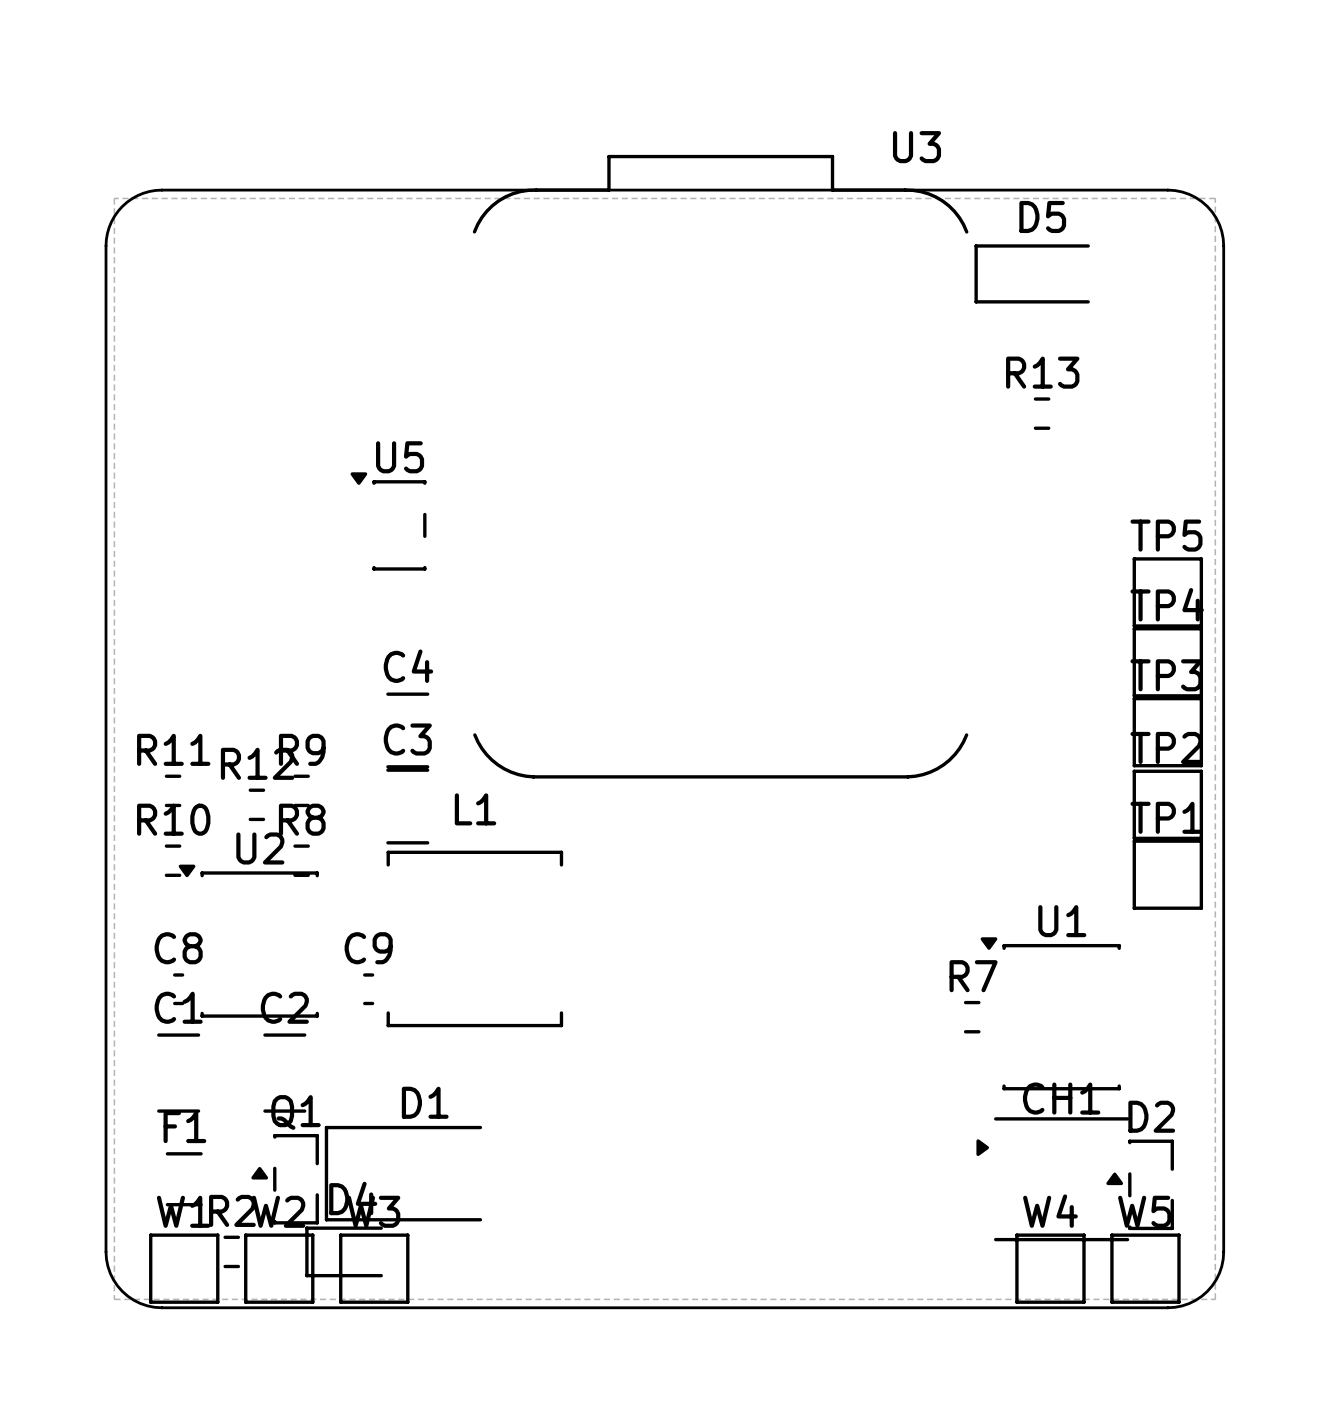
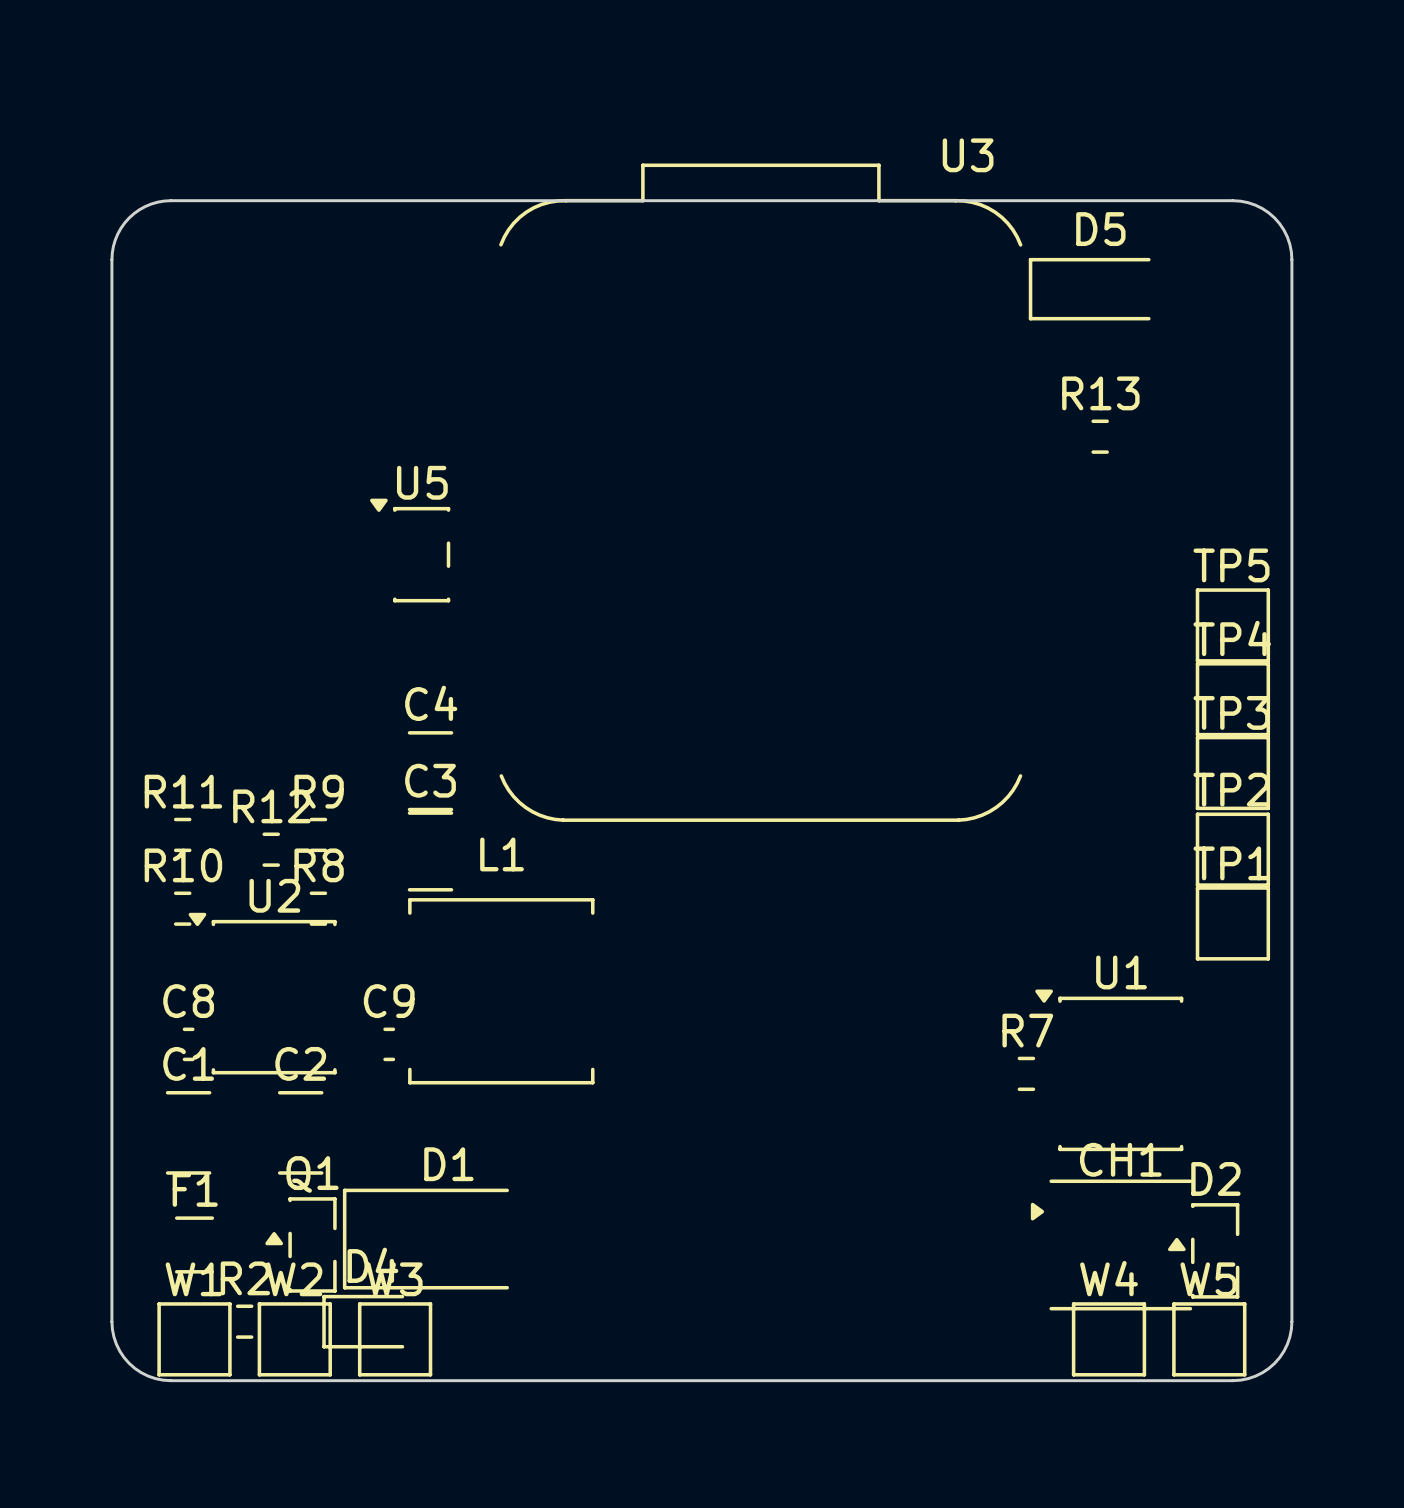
zone outline: (114, 198) (1215, 198) (1215, 1299) (114, 1299) (114, 198) -> none

